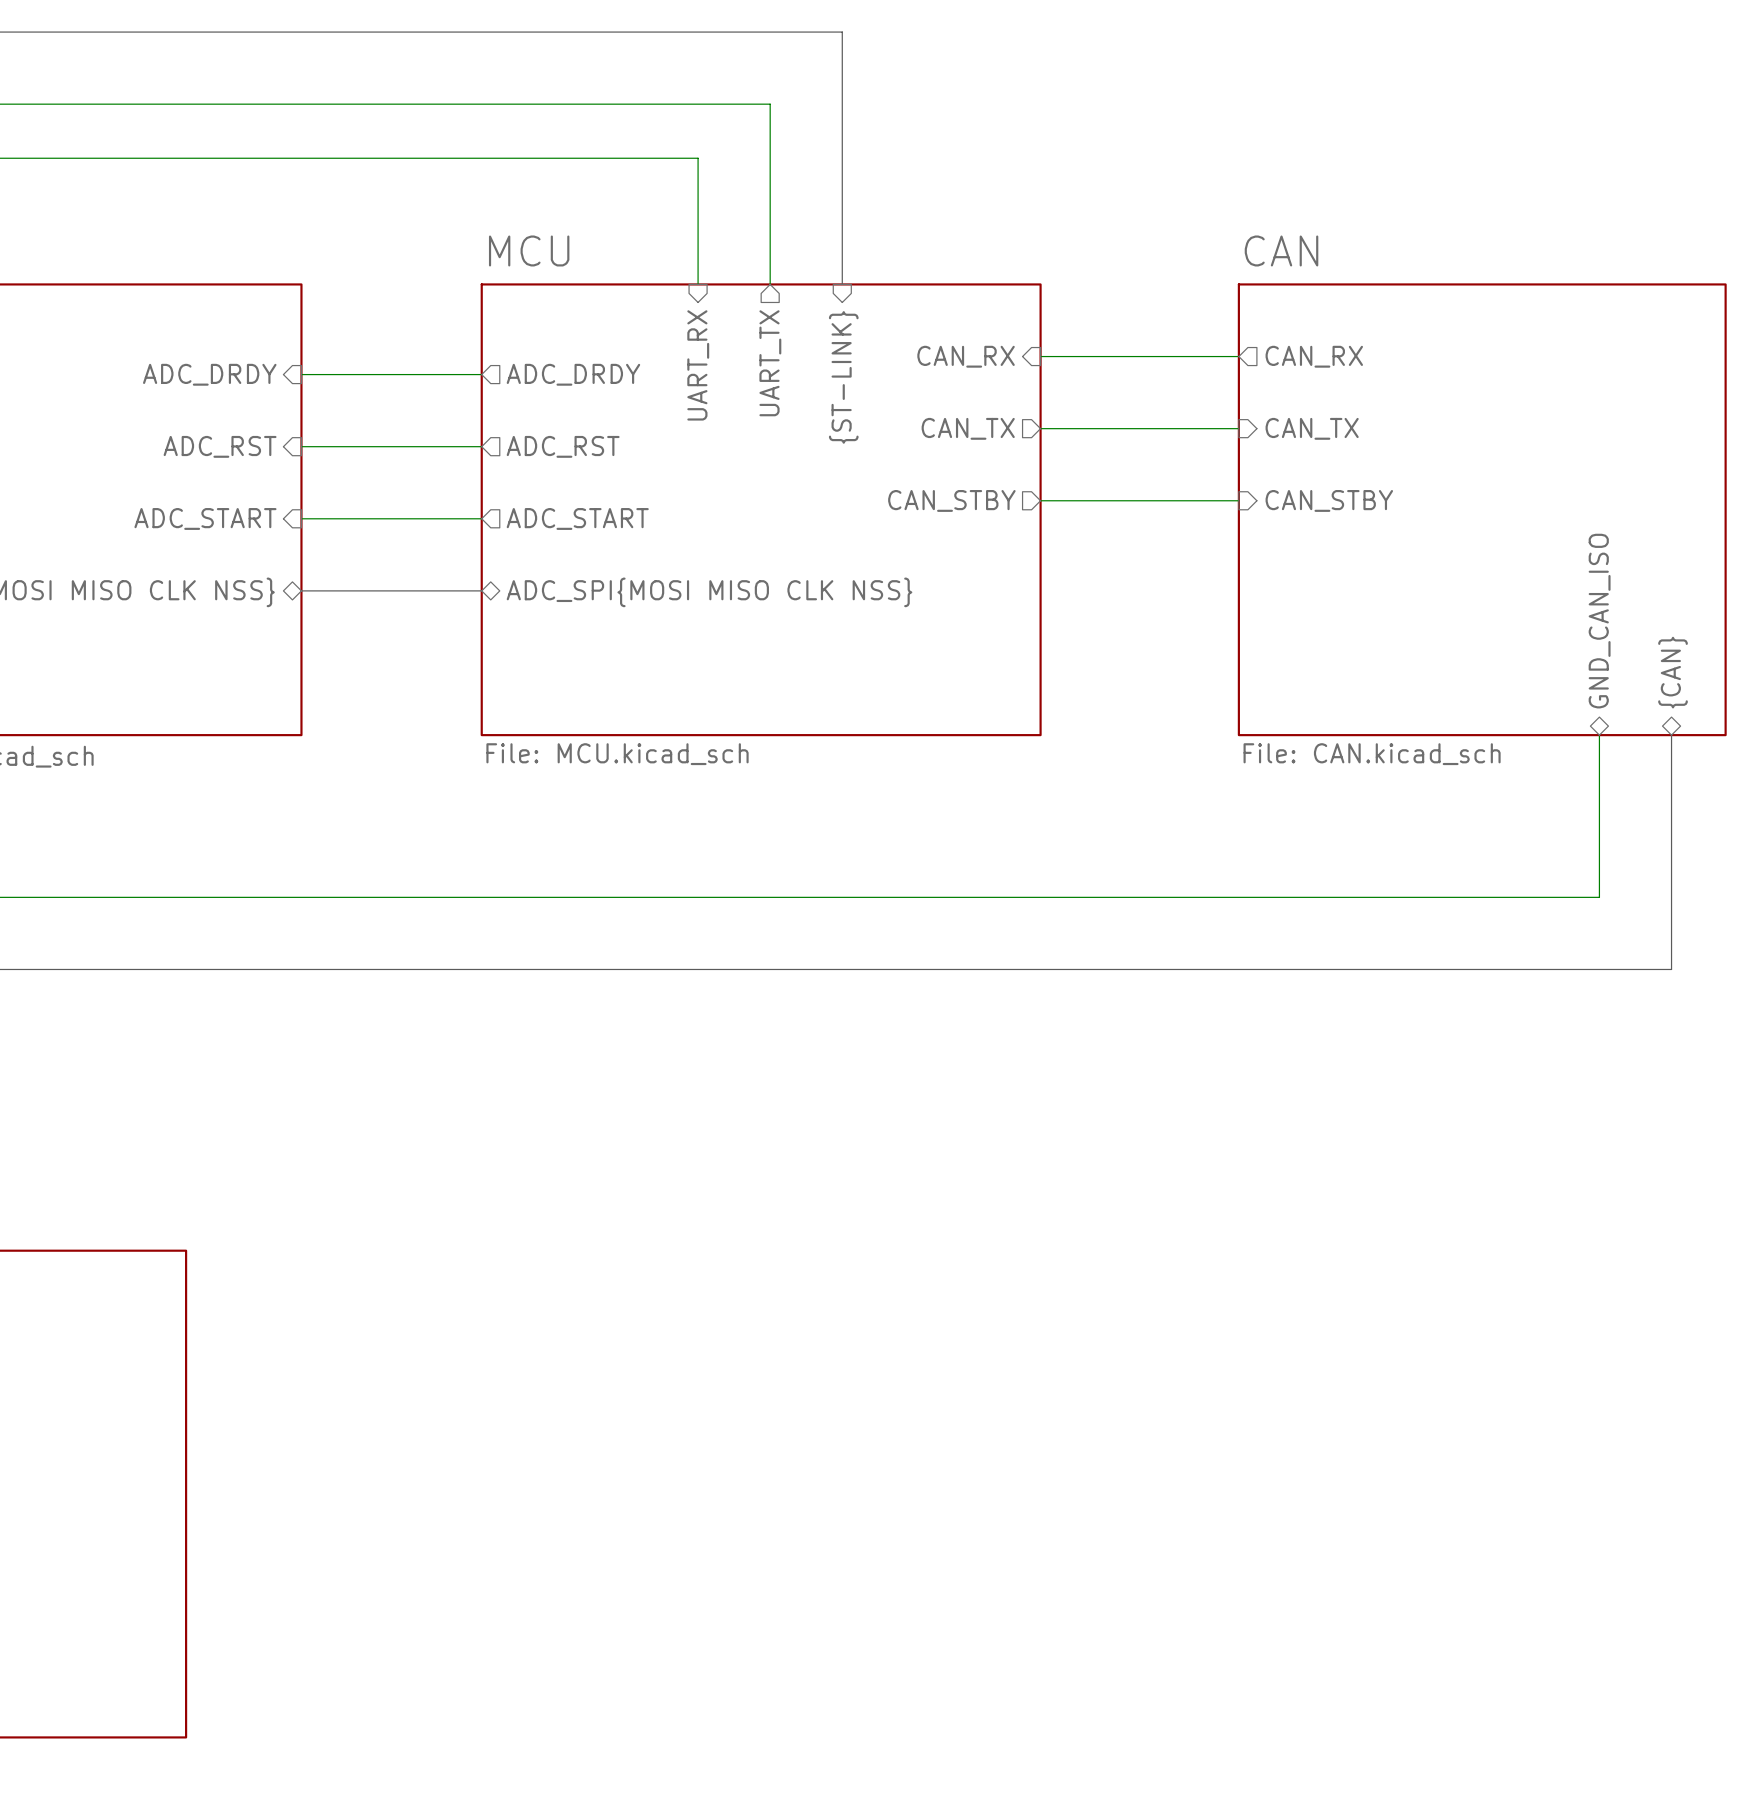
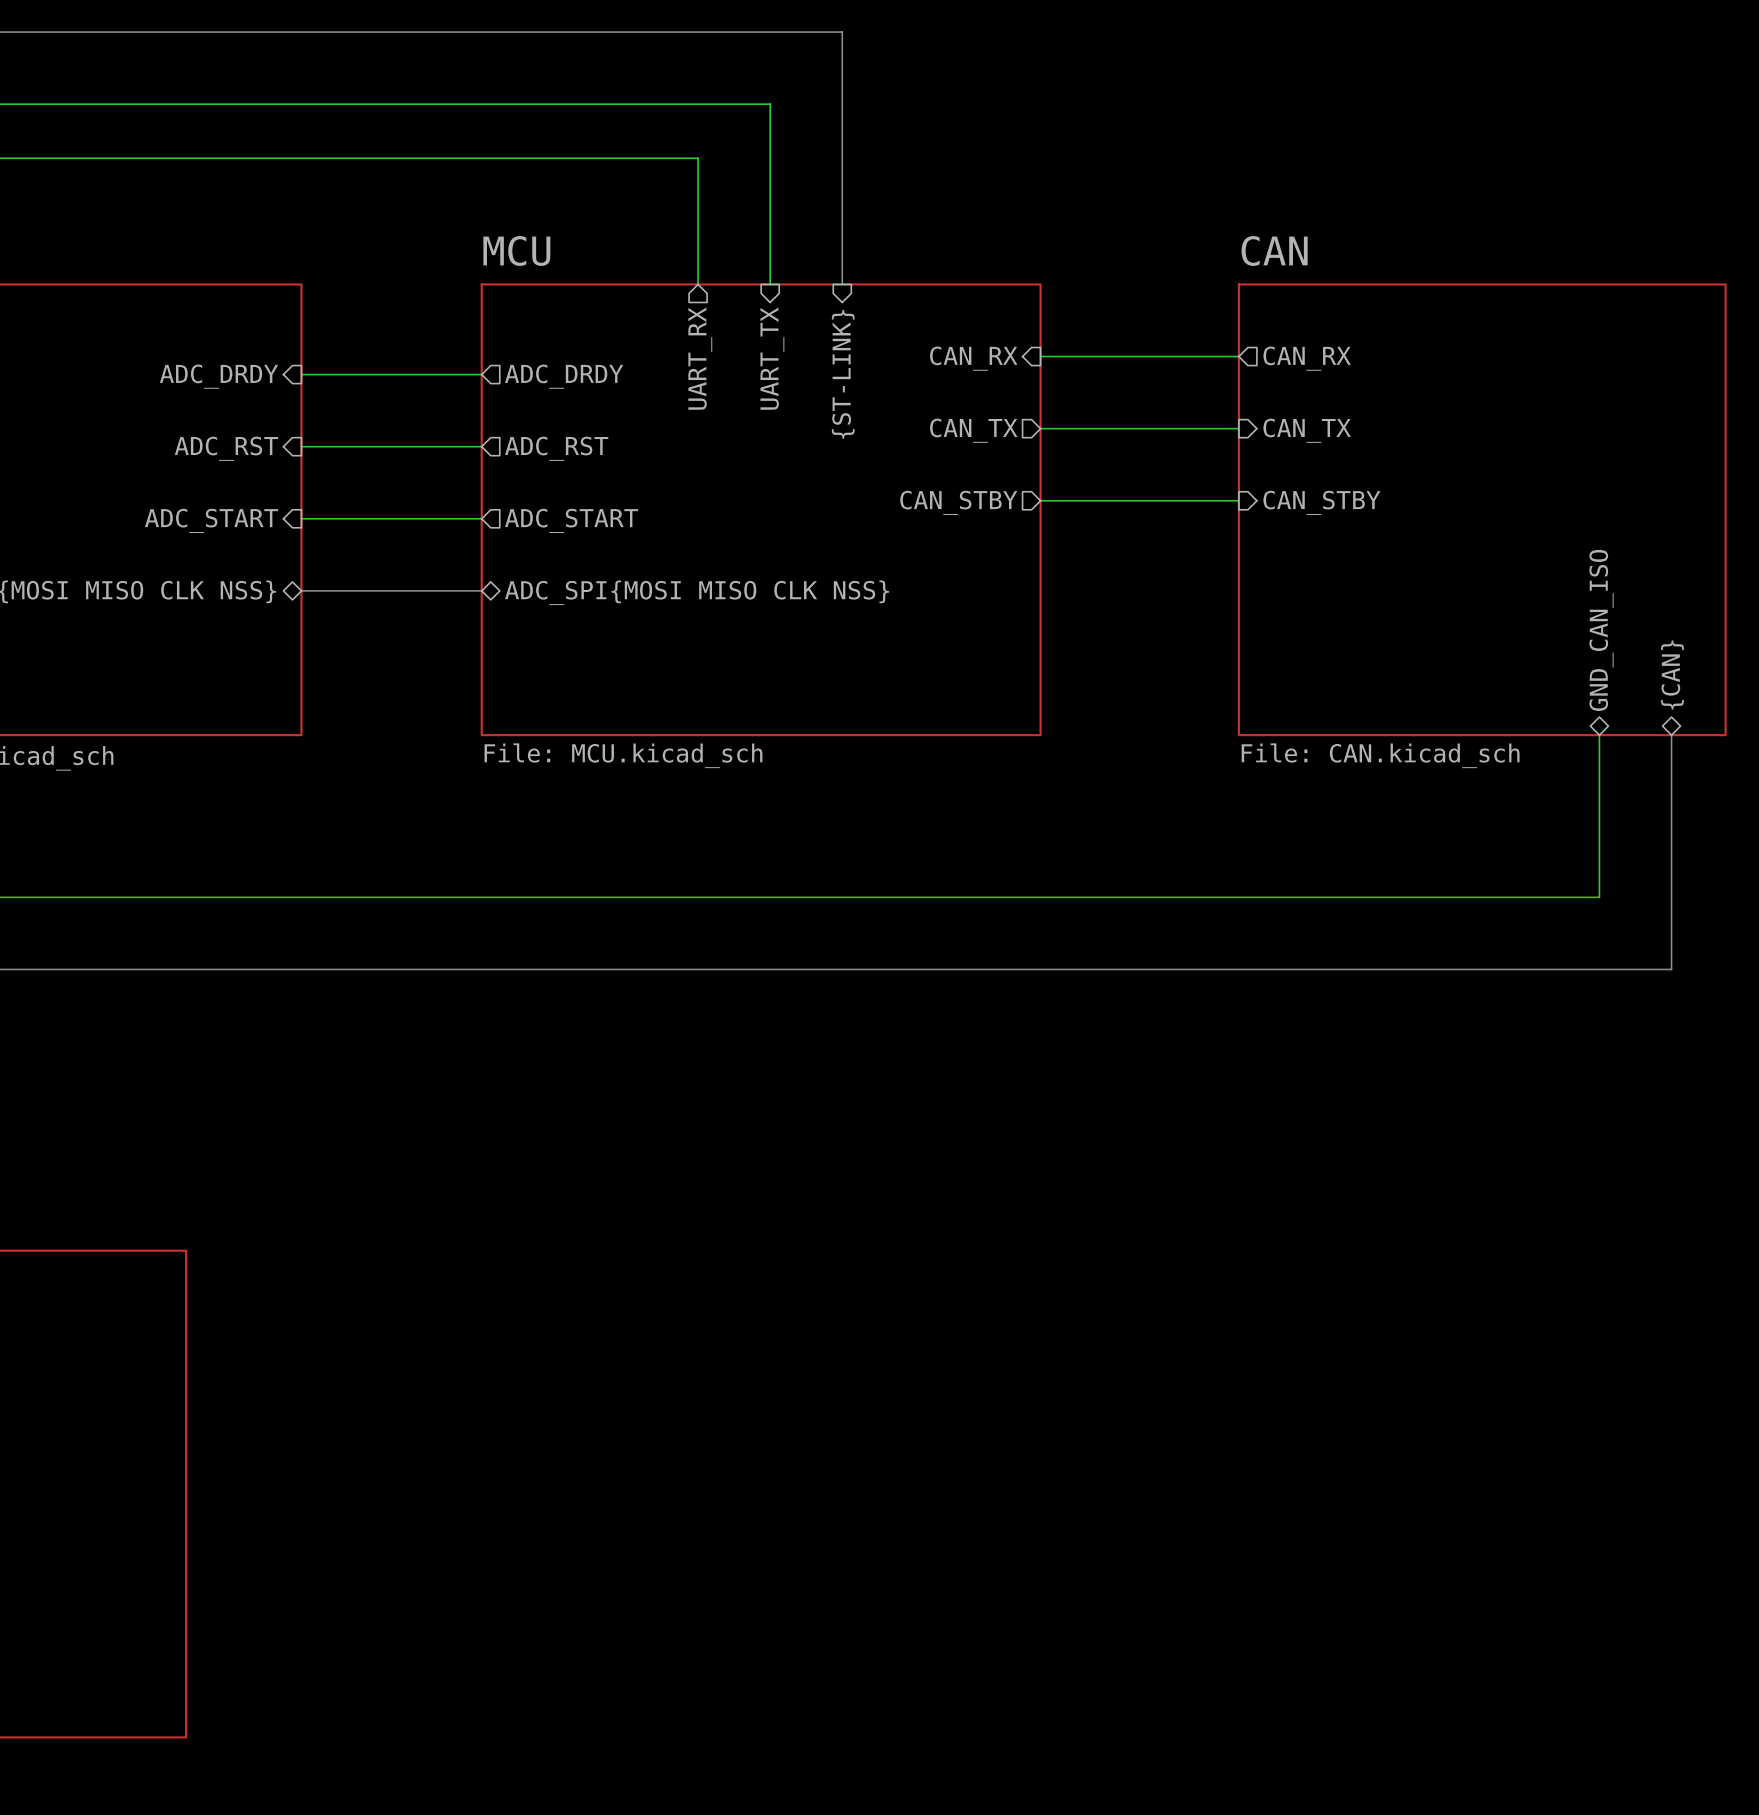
sheet pin shape: output (770, 363) -> input (772, 358)
sheet pin shape: input (698, 365) -> output (700, 358)

